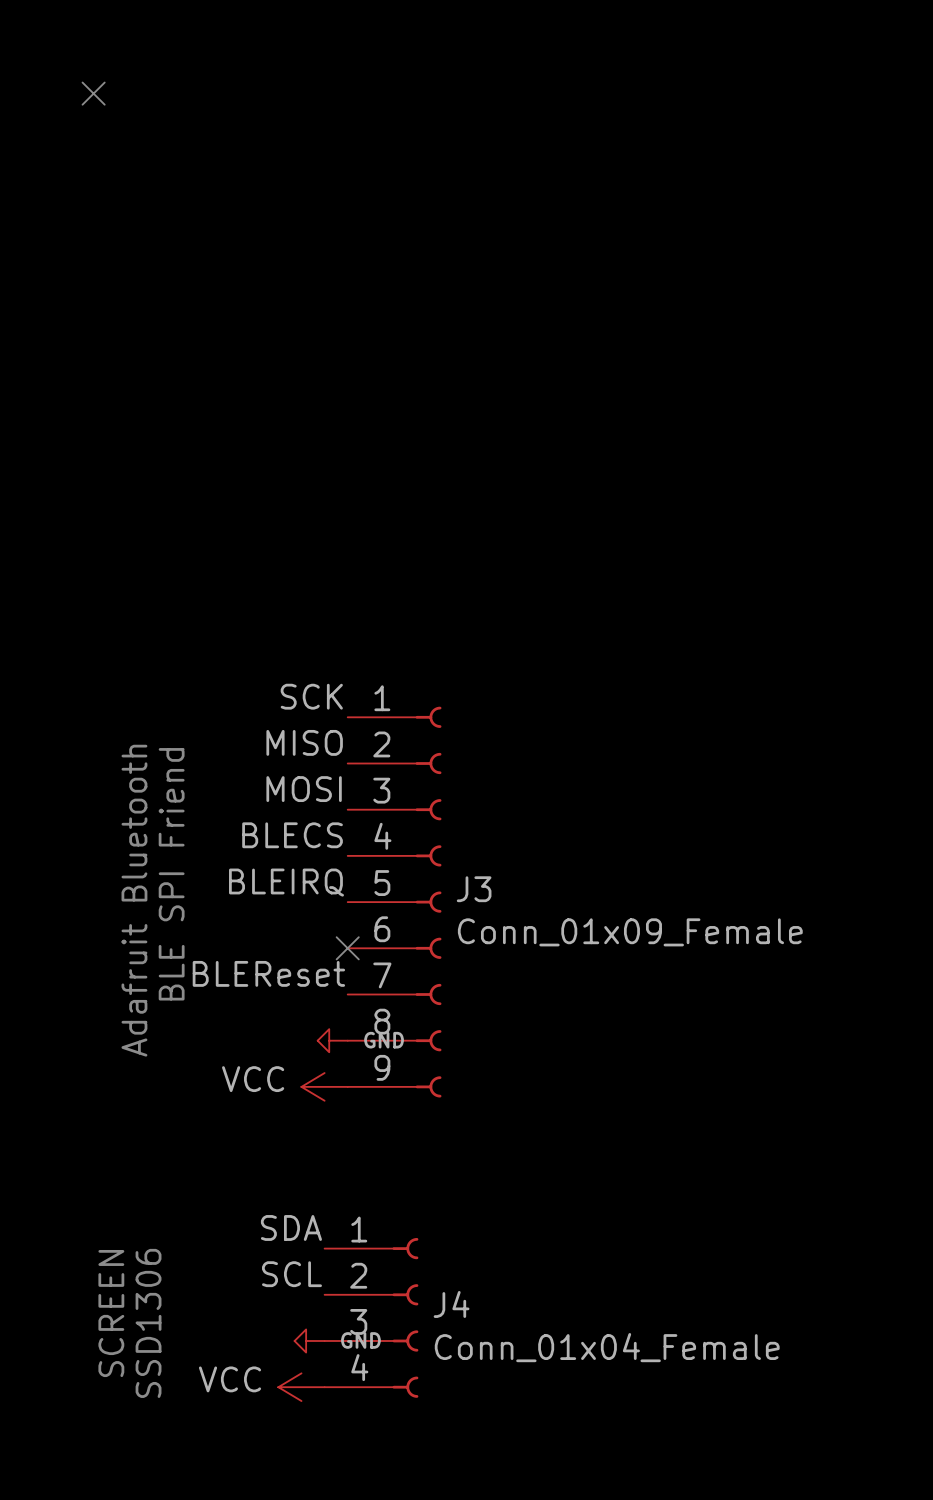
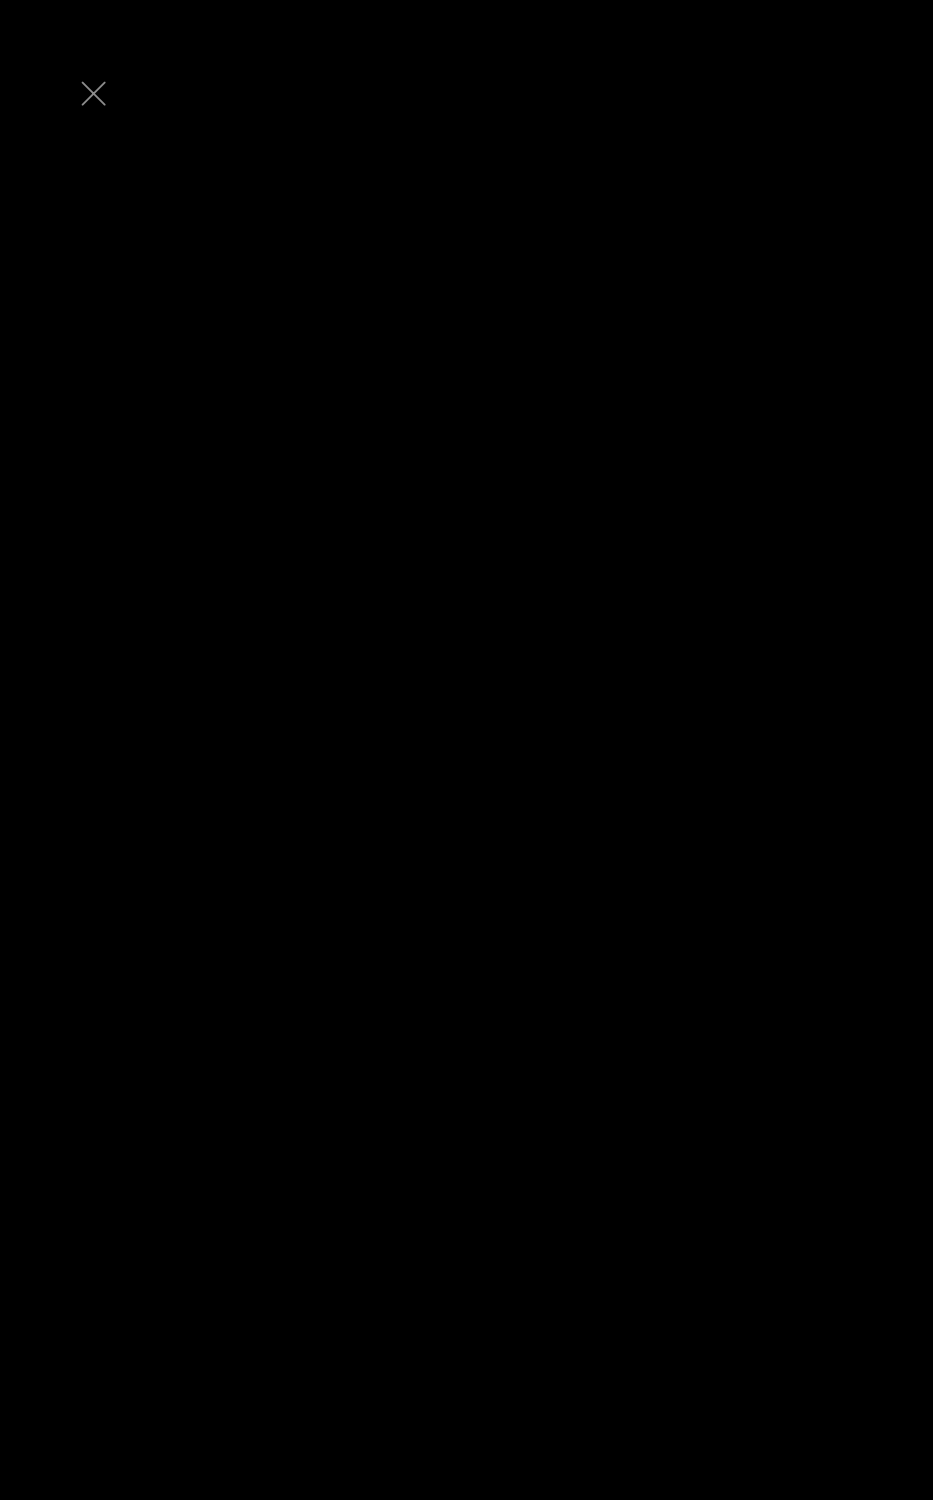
label: SCK (311, 696) -> none
label: MISO (304, 742) -> none
label: MOSI (304, 789) -> none
label: BLECS (292, 835) -> none
text: BLE SPI Friend (171, 874) -> none
label: BLEIRQ (286, 882) -> none
text: Adafruit Bluetooth (134, 900) -> none
J3: Conn_01x09_Female (394, 902) -> none
no-connect mark: (347, 948) -> none
label: BLEReset (268, 973) -> none
power symbol: GND (332, 1040) -> none
power symbol: VCC (324, 1086) -> none
label: SDA (291, 1227) -> none
label: SCL (291, 1274) -> none
text: SCREEN (111, 1313) -> none
J4: Conn_01x04_Female (371, 1317) -> none
text: SSD1306 (148, 1323) -> none
power symbol: GND (309, 1340) -> none
power symbol: VCC (301, 1387) -> none

